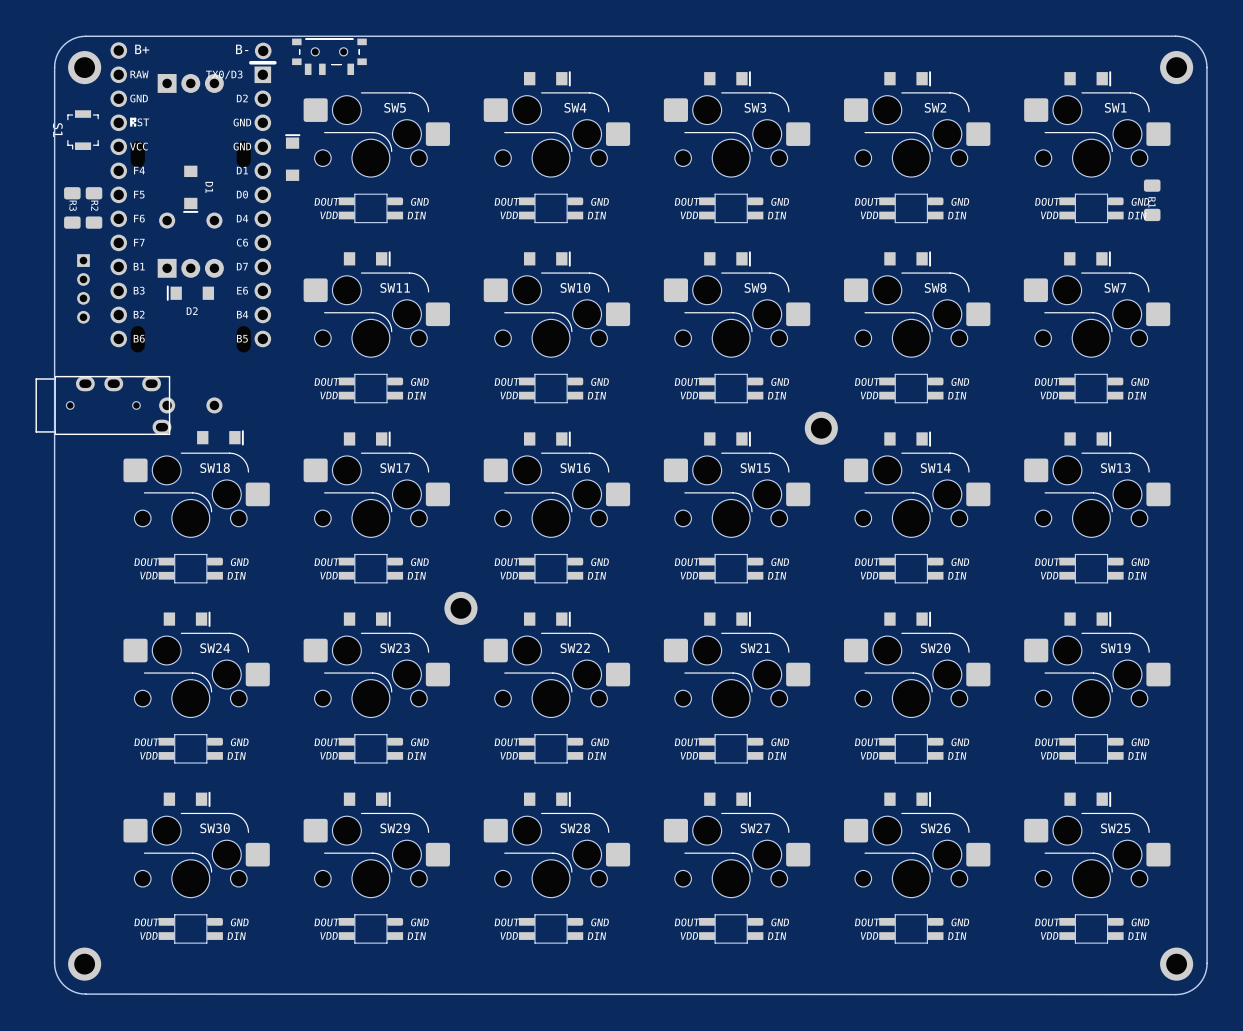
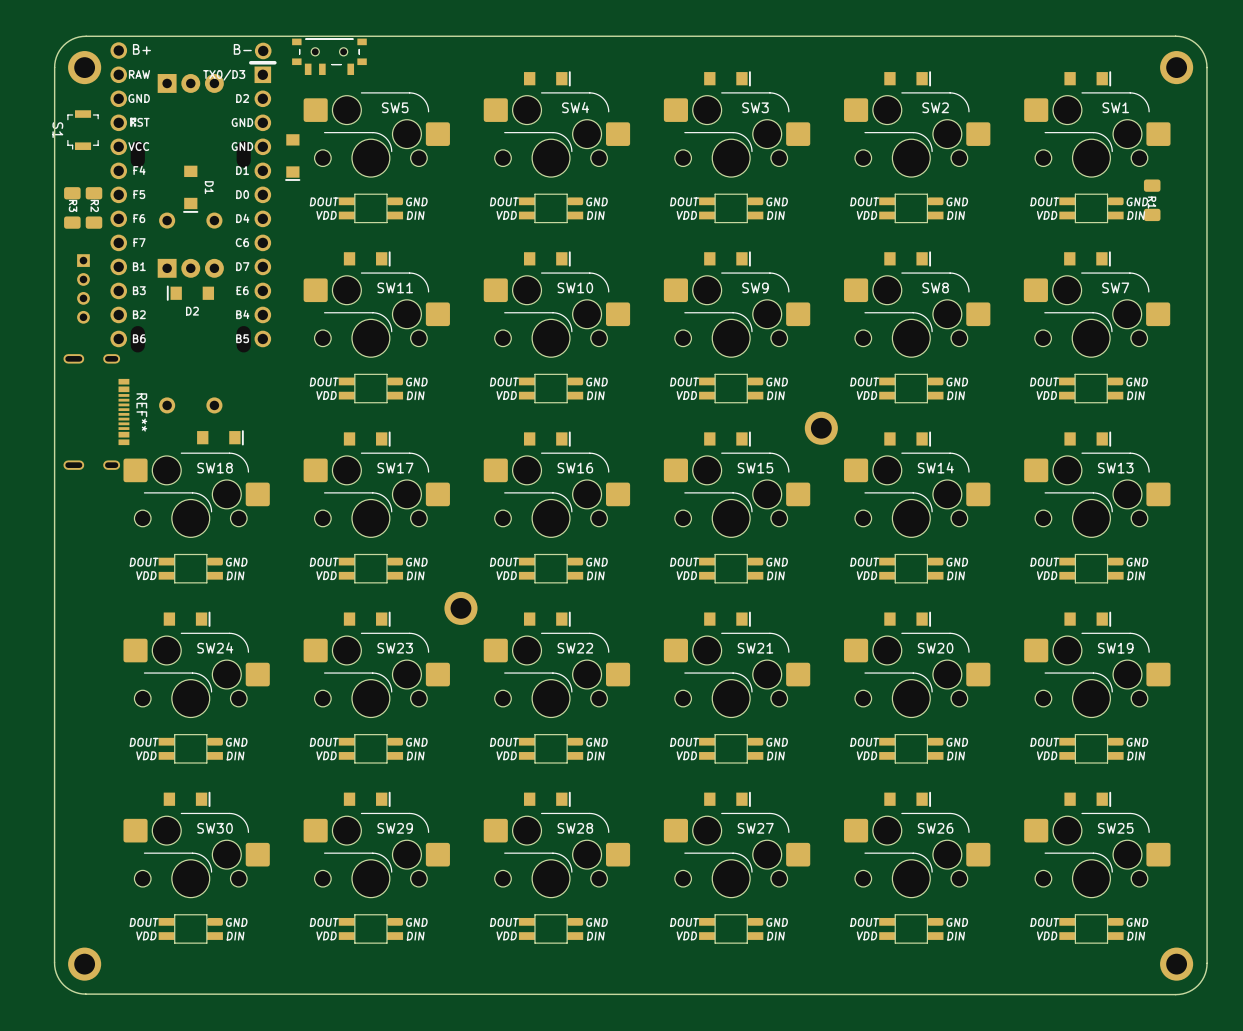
SW5 footprint: [285, 92, 450, 224] -> [285, 92, 450, 224]
part: (103, 405) -> none
REF**: none -> (96, 412)

